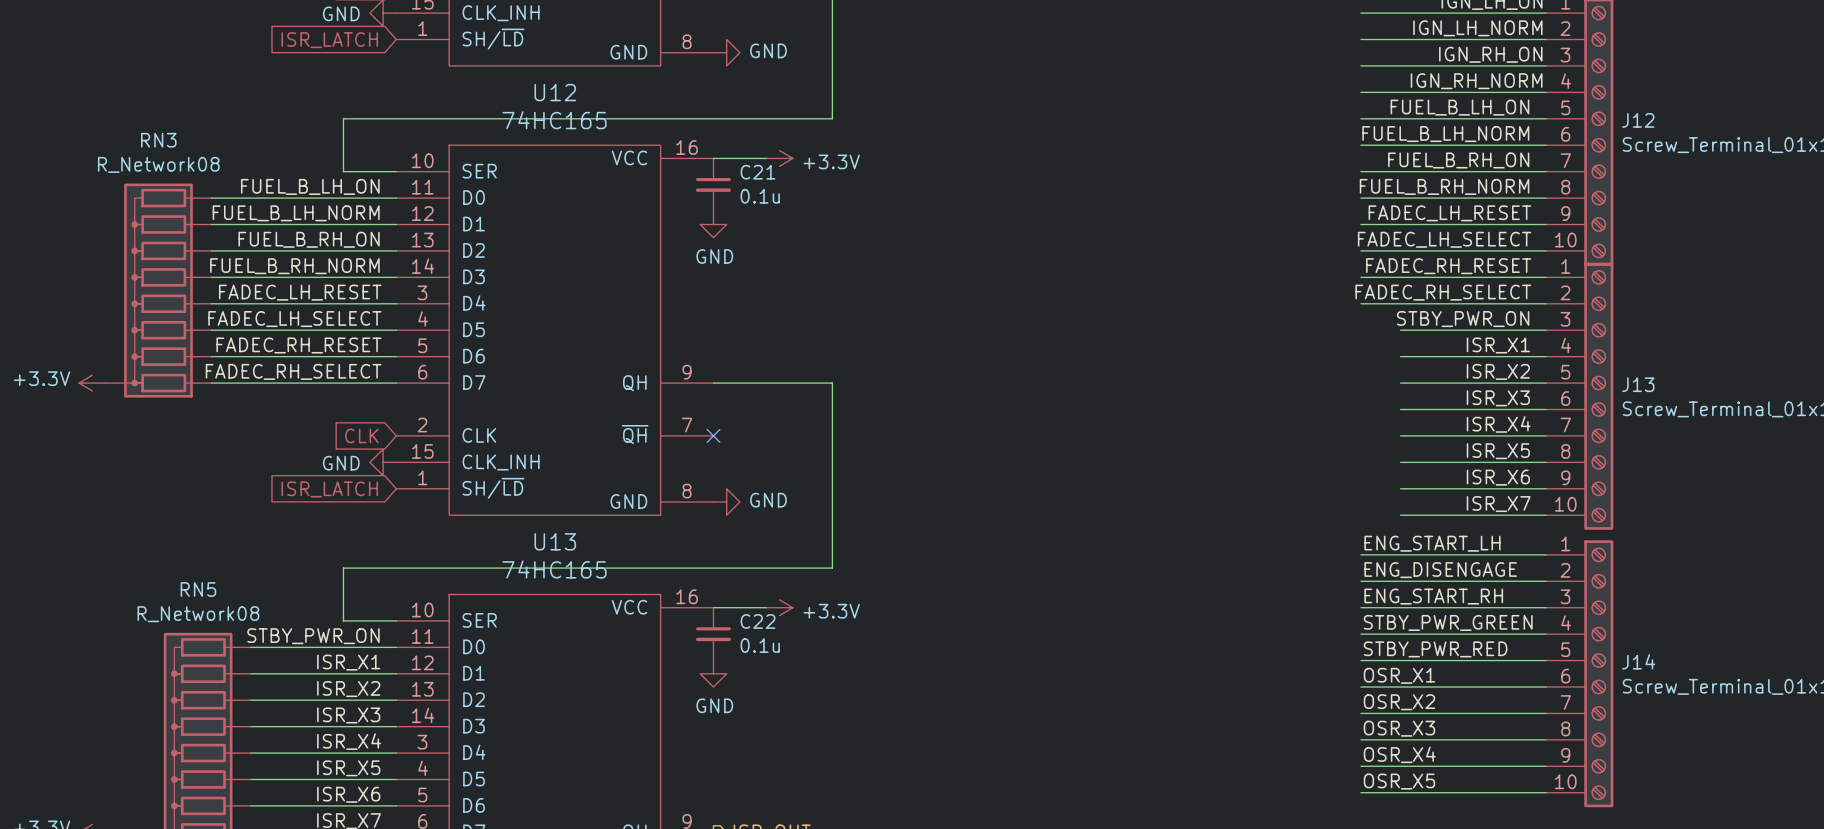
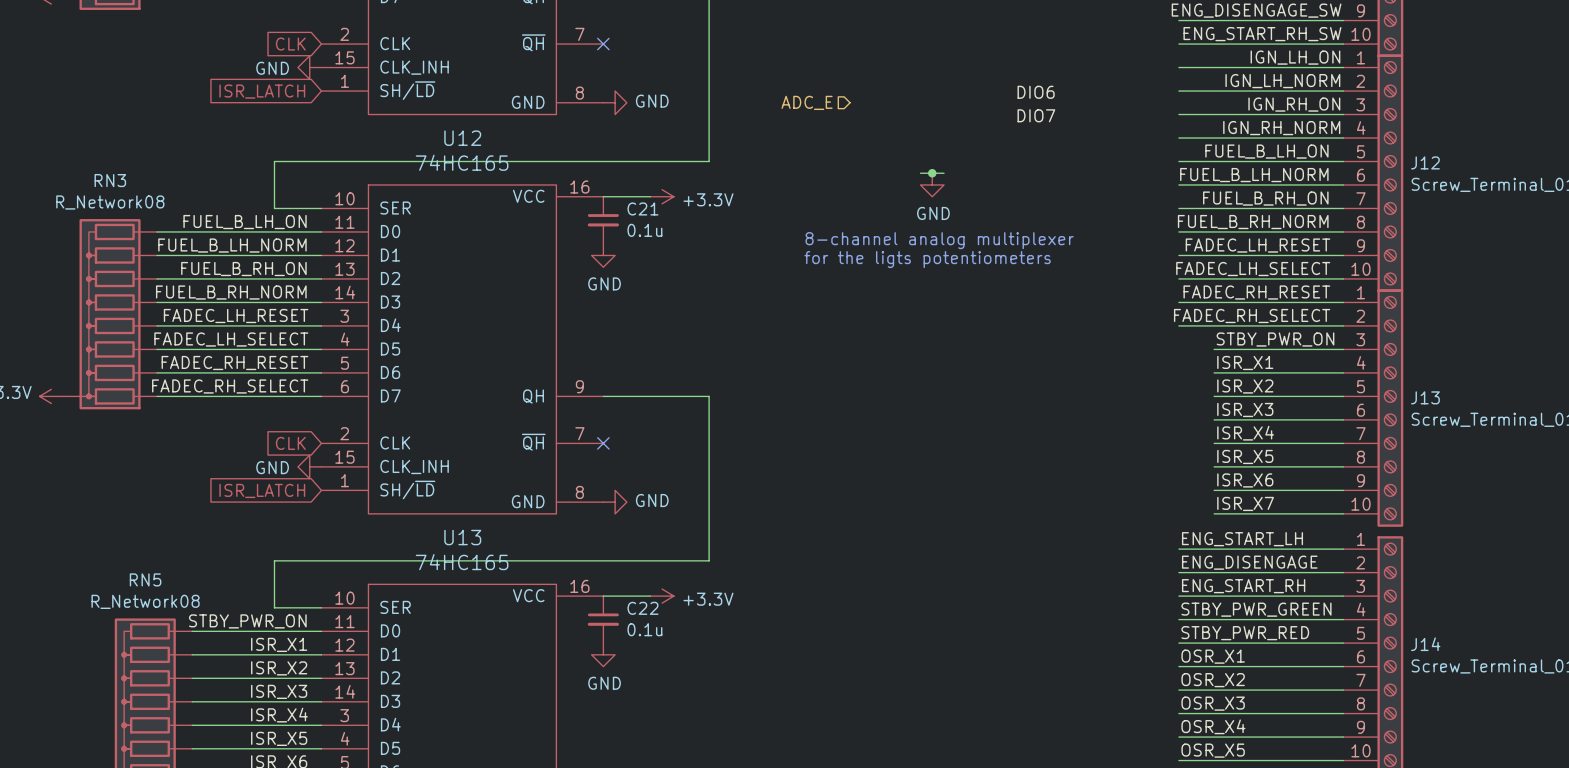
label: none -> DIO6 (1036, 92)
hierarchical label: none -> ADC_E (807, 102)
label: none -> DIO7 (1036, 115)
wire: none -> (920, 173) (944, 173)
junction: none -> (932, 173)
power symbol: none -> GND (932, 184)
text: none -> 8-channel analog multiplexer (939, 240)
text: none -> for the ligts potentiometers (927, 259)
label position: STBY_PWR_ON (1463, 319) -> STBY_PWR_ON (1275, 339)
label position: ISR_X1 (1498, 345) -> ISR_X1 (1245, 363)
label position: ISR_X2 (1498, 371) -> ISR_X2 (1245, 386)
label position: ISR_X3 (1498, 398) -> ISR_X3 (1245, 409)
label position: ISR_X4 (1498, 424) -> ISR_X4 (1245, 433)
label position: ISR_X5 (1498, 451) -> ISR_X5 (1245, 456)
label position: ISR_X6 (1498, 477) -> ISR_X6 (1245, 480)
label position: ISR_X7 (1498, 504) -> ISR_X7 (1245, 503)

